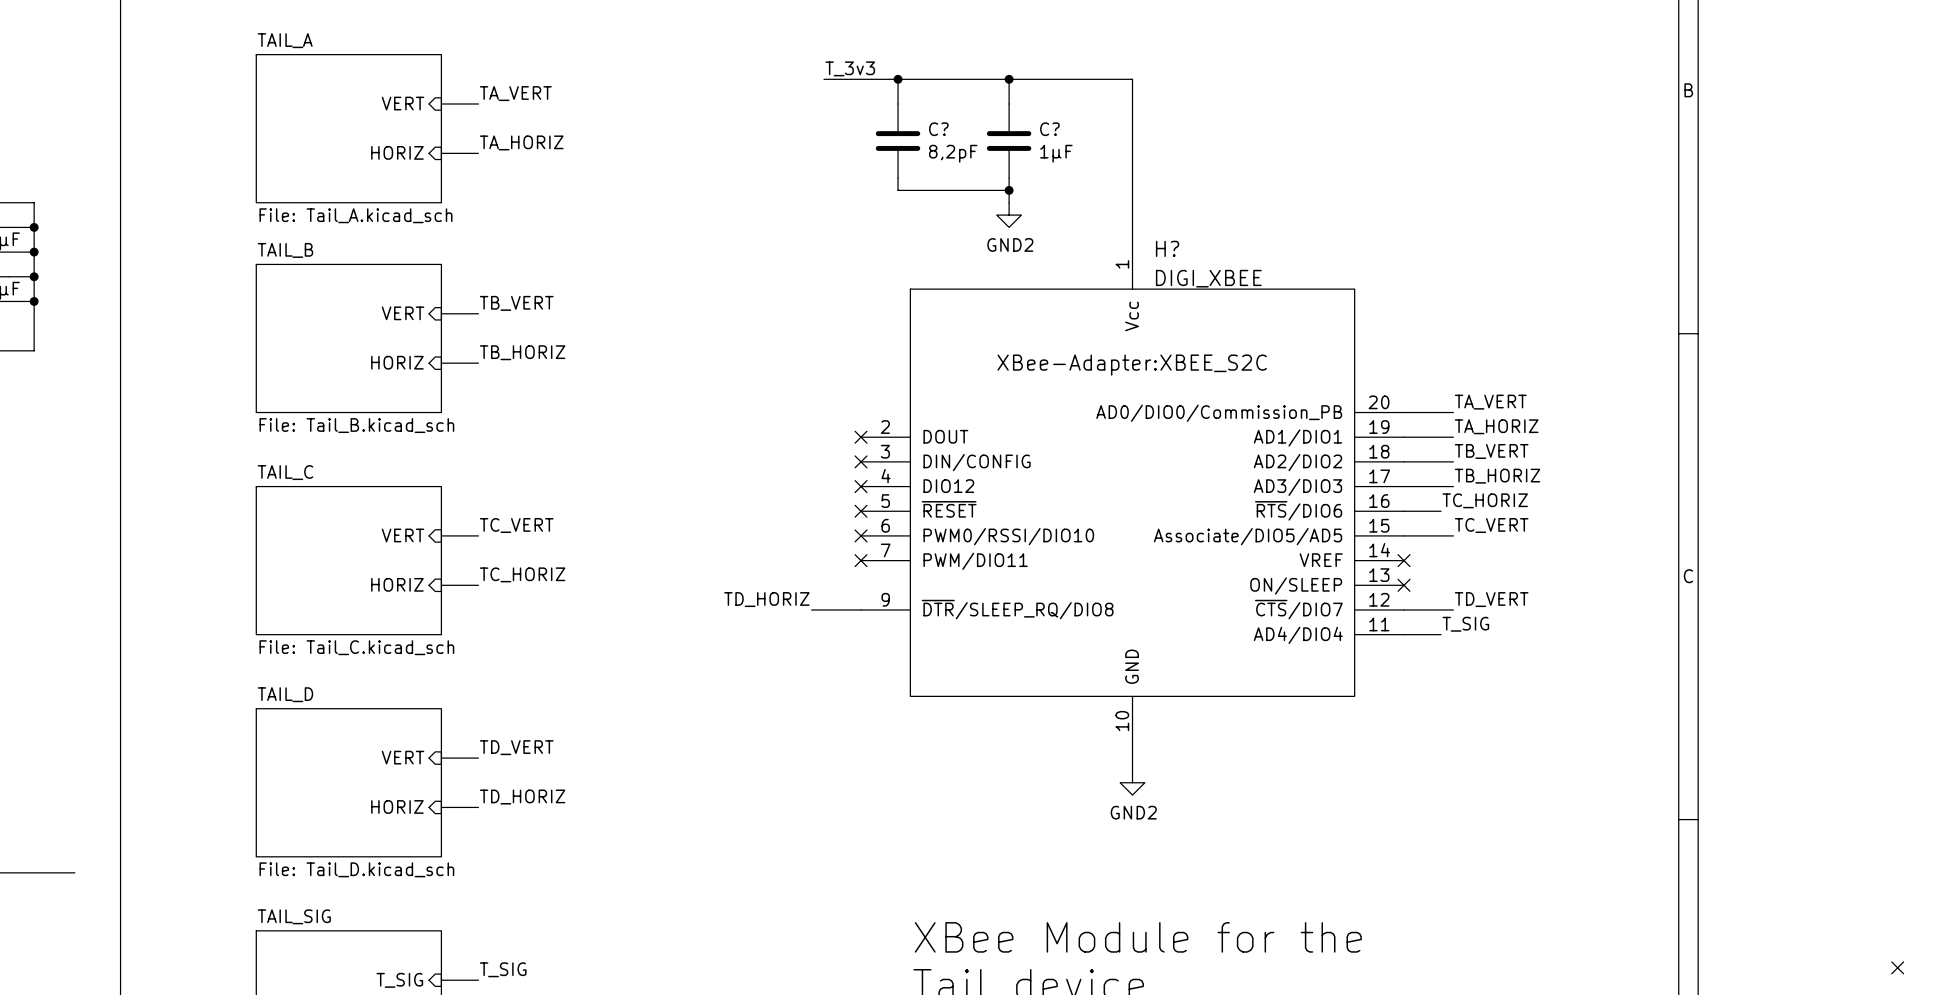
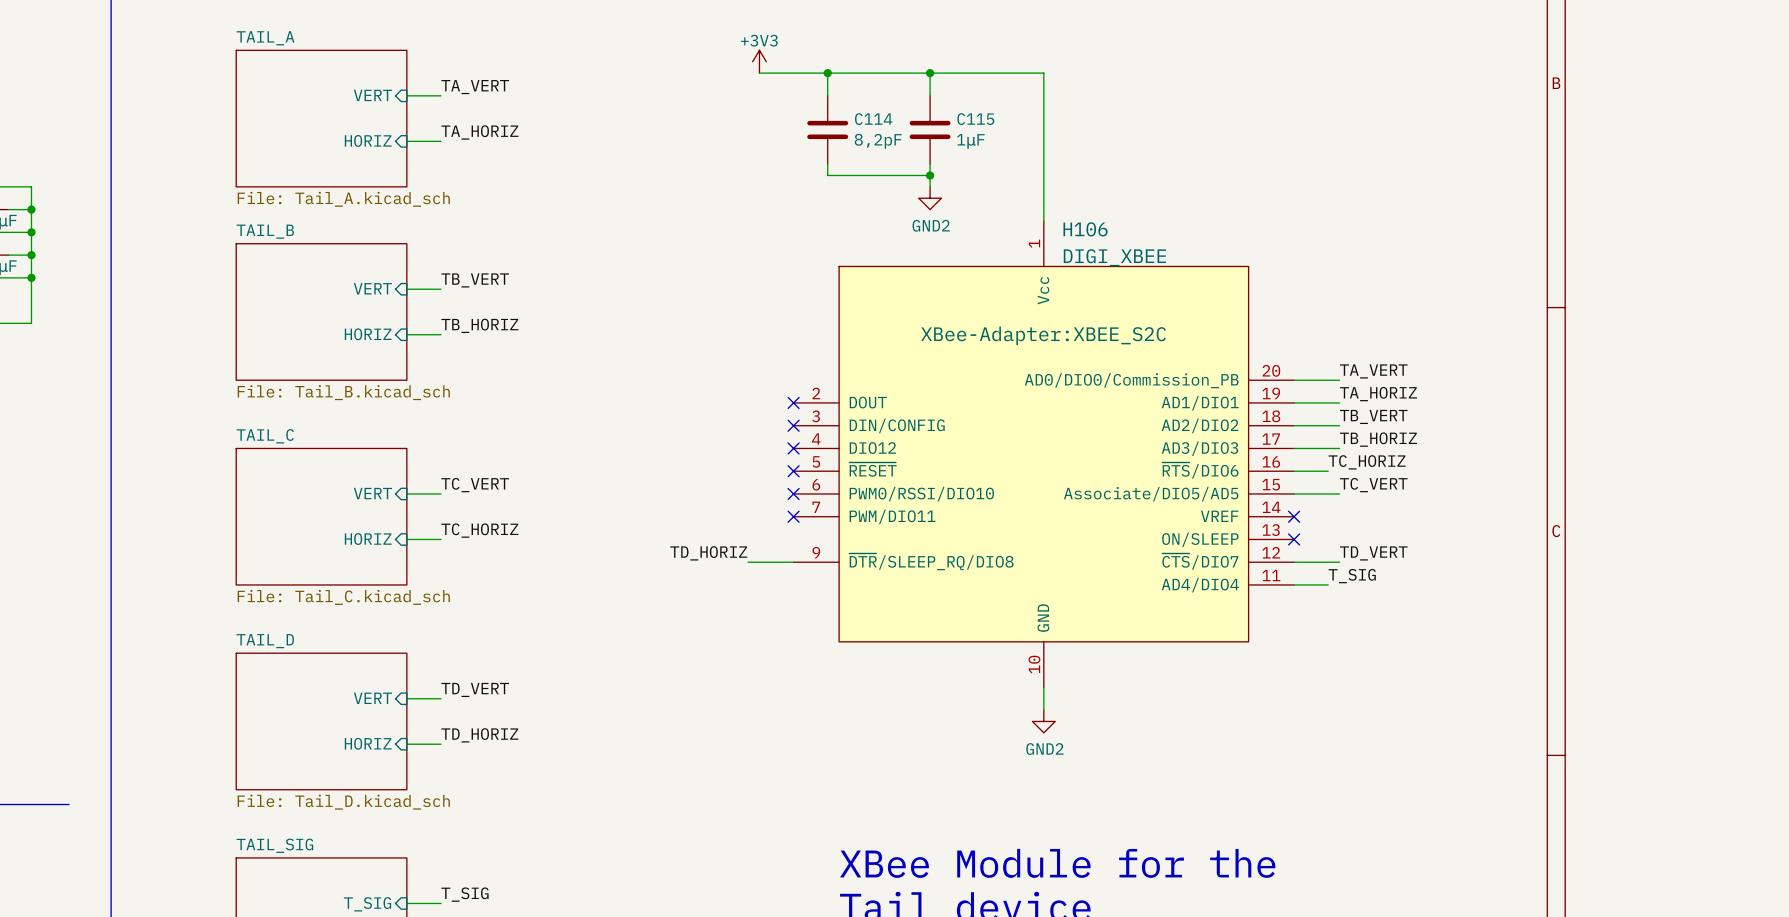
power symbol: none -> +3V3 (759, 61)
label: T_3v3 (850, 68) -> none
C? name: C? (938, 129) -> C114 (873, 119)
C? name: C? (1049, 129) -> C115 (975, 119)
H? name: H? (1167, 248) -> H106 (1085, 229)
no-connect mark: (1897, 967) -> none

